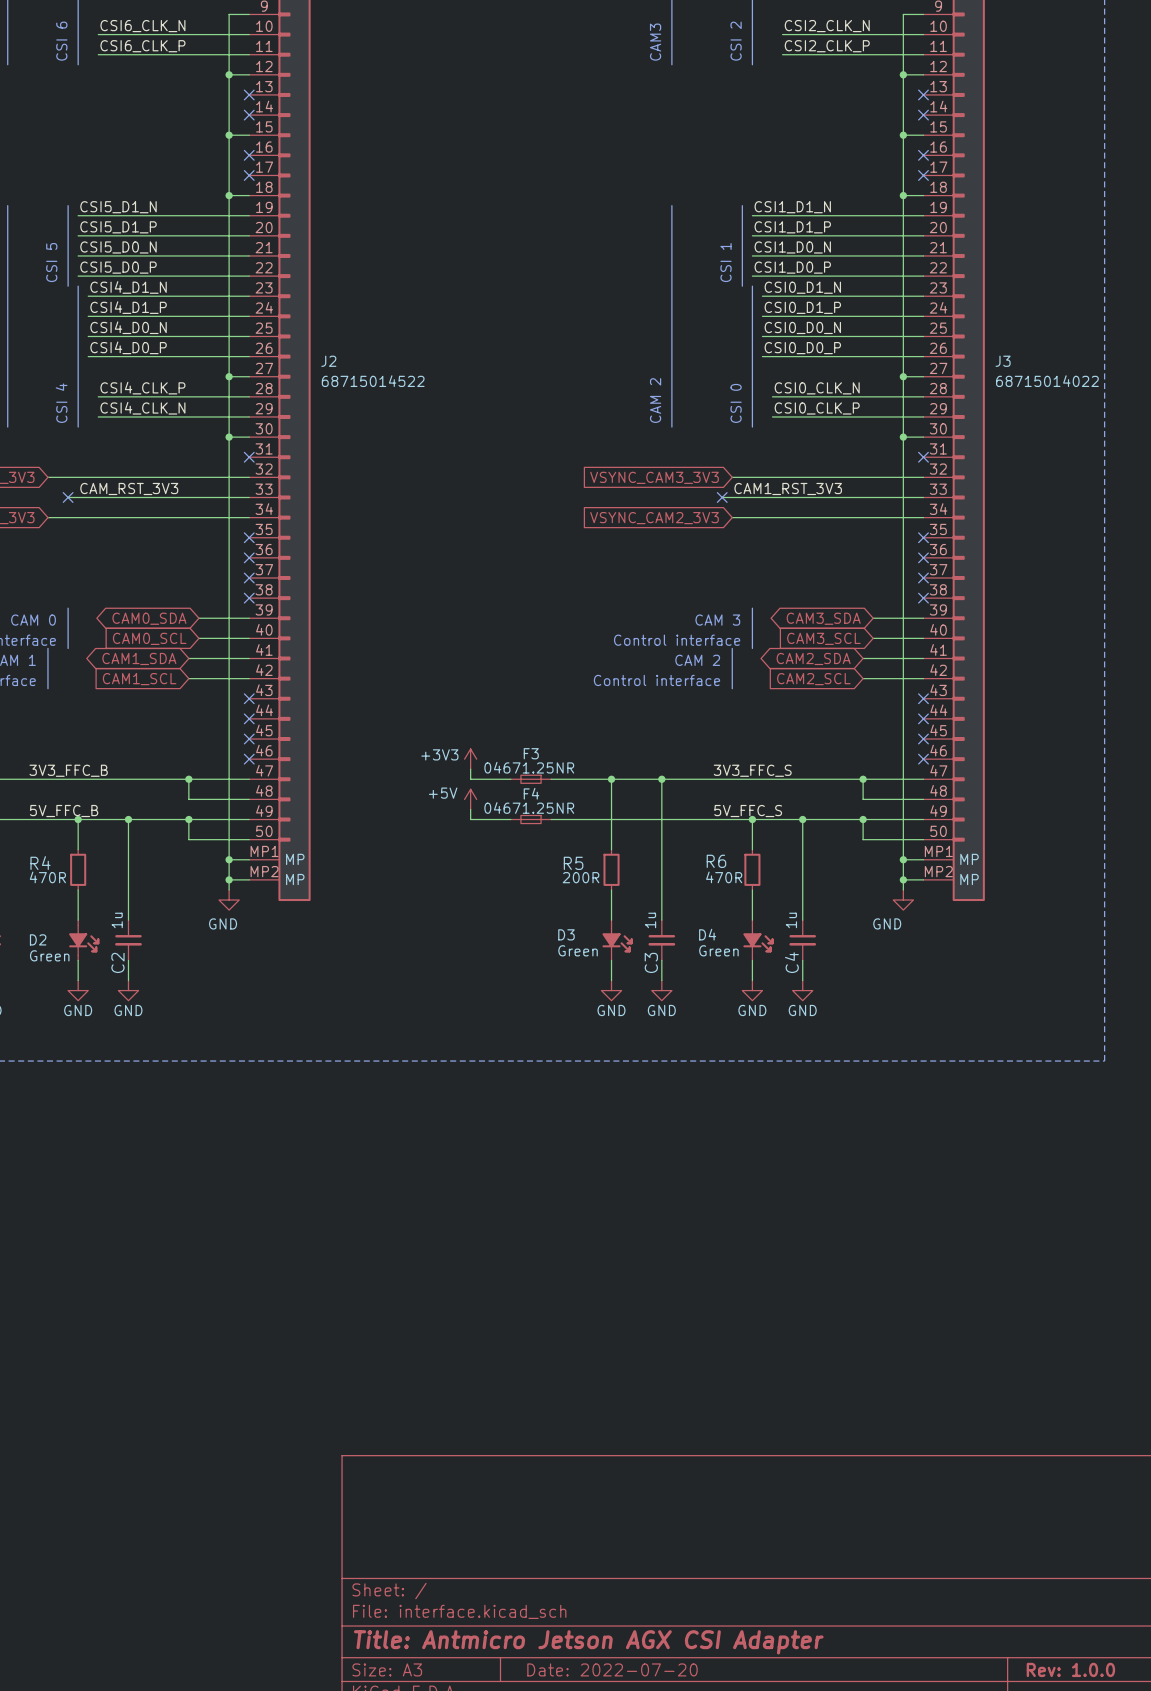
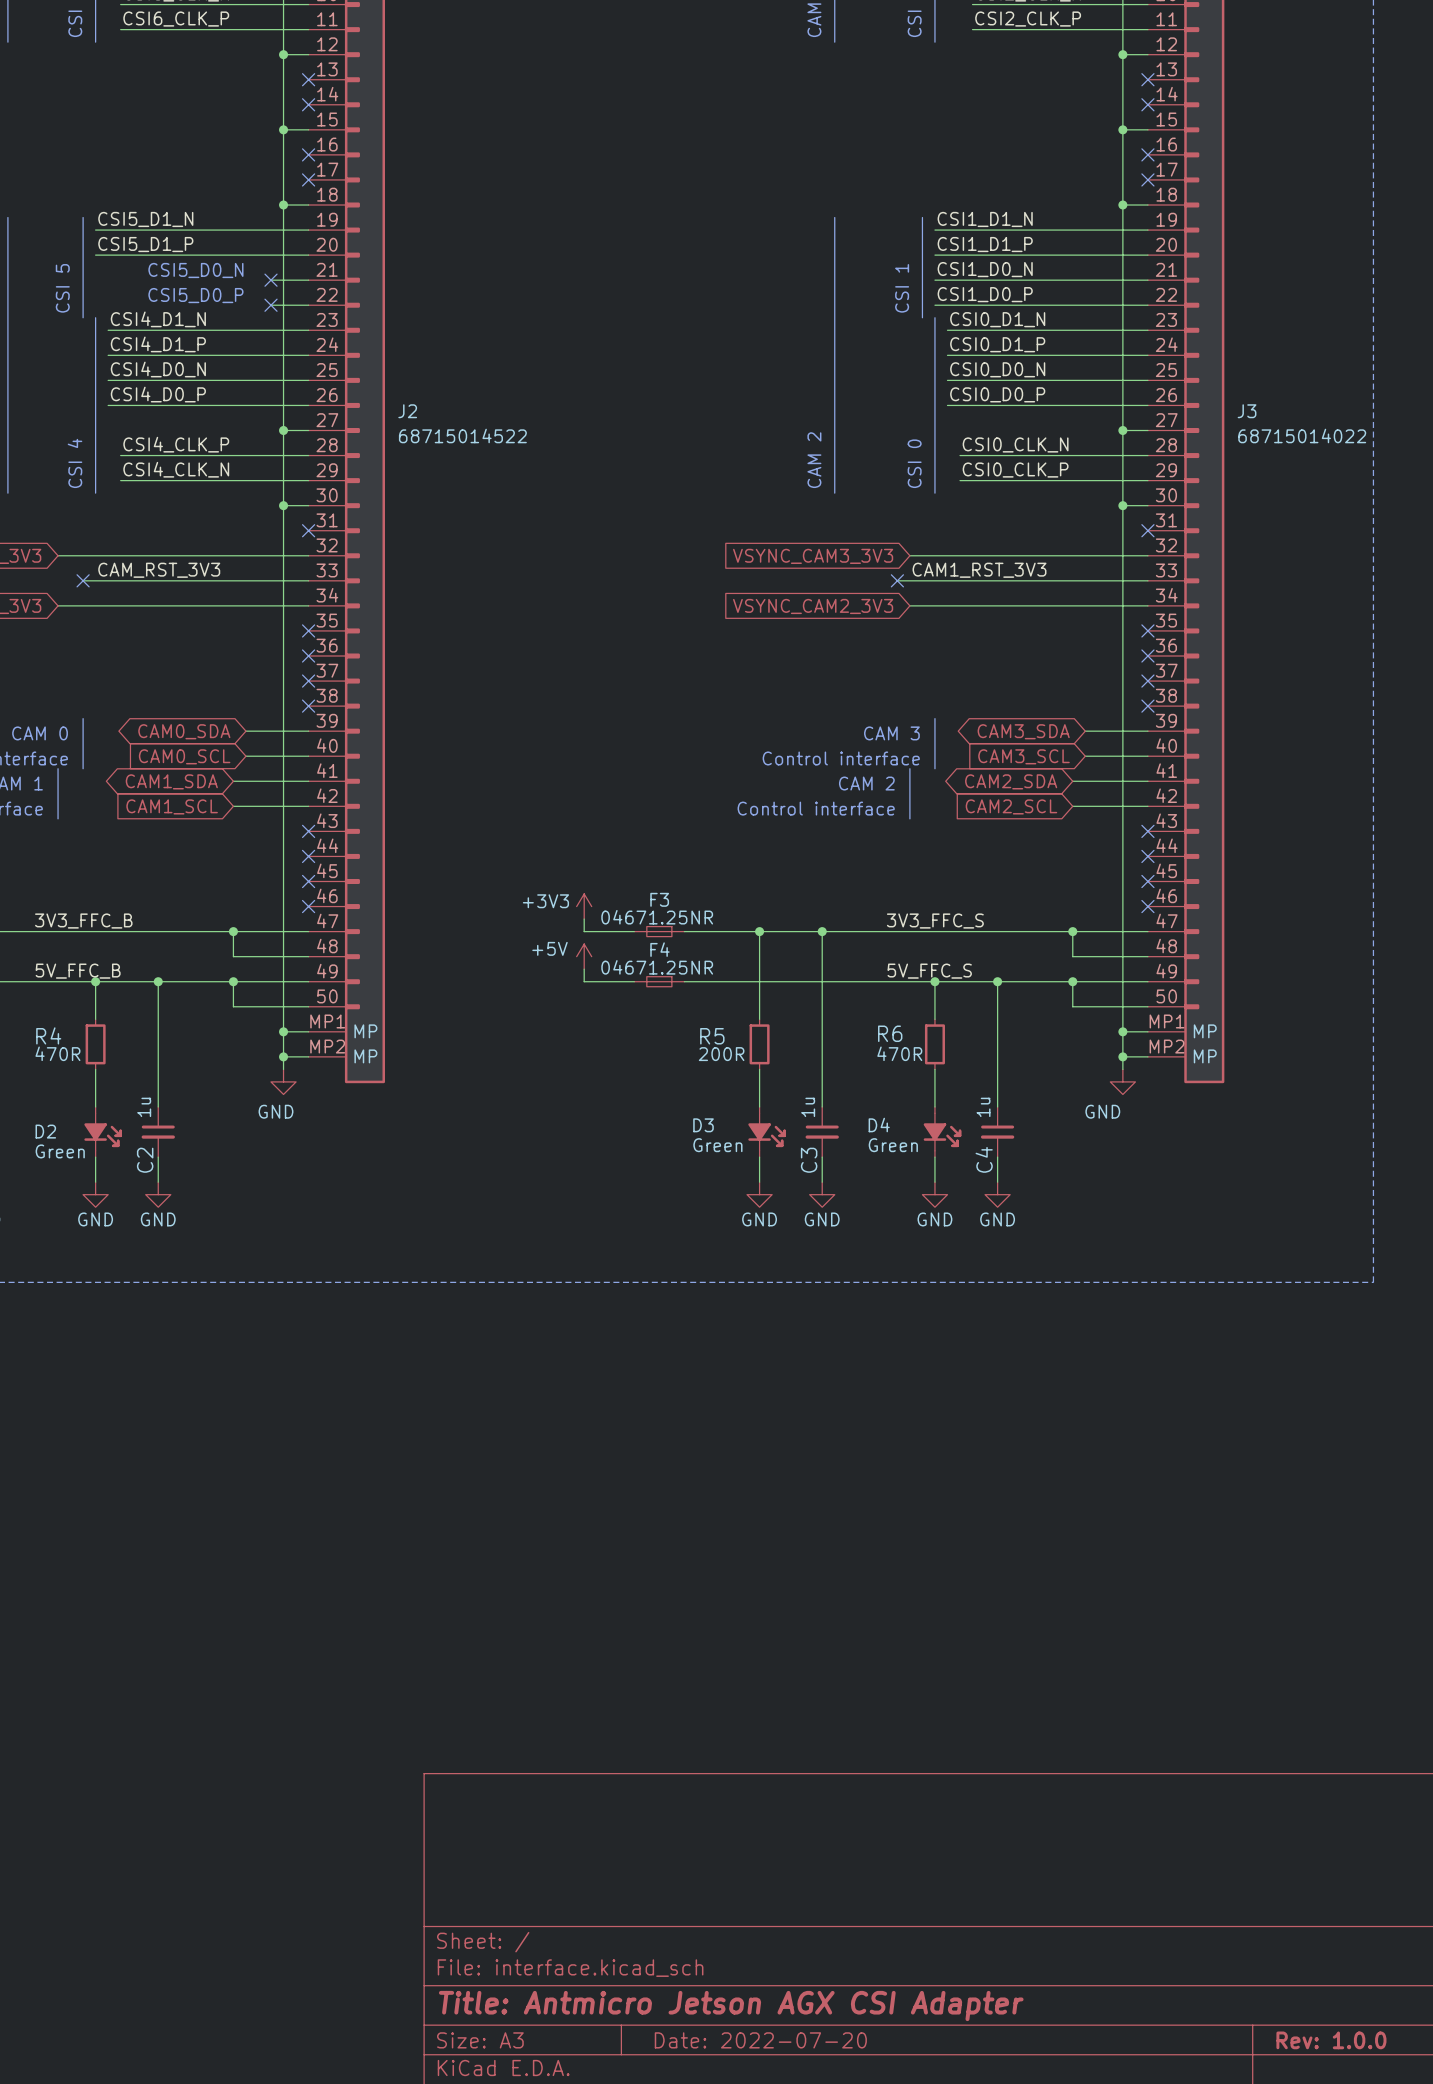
label: CSI5_D0_N (118, 247) -> none
text: none -> CSI5_D0_N (195, 270)
wire: (78, 255) (219, 255) -> none
no-connect mark: none -> (271, 280)
label: CSI5_D0_P (118, 267) -> none
text: none -> CSI5_D0_P (195, 295)
wire: (78, 276) (219, 276) -> none
no-connect mark: none -> (271, 305)

